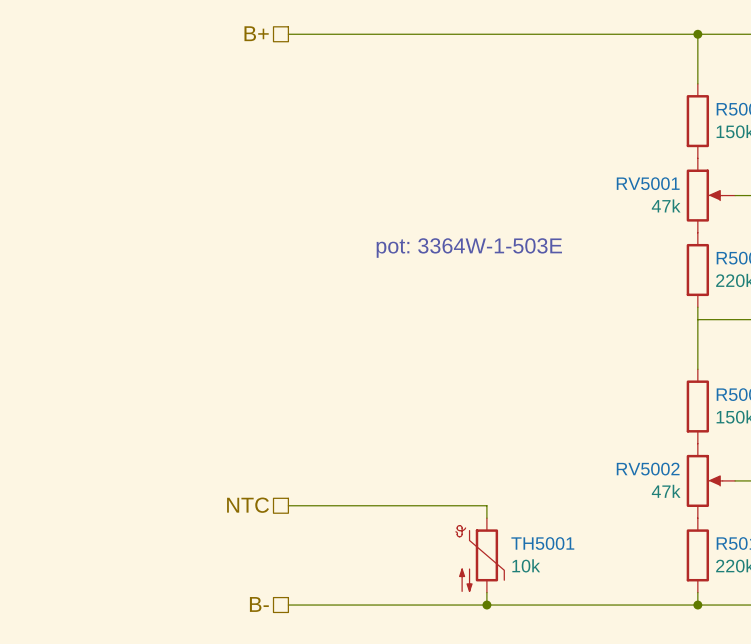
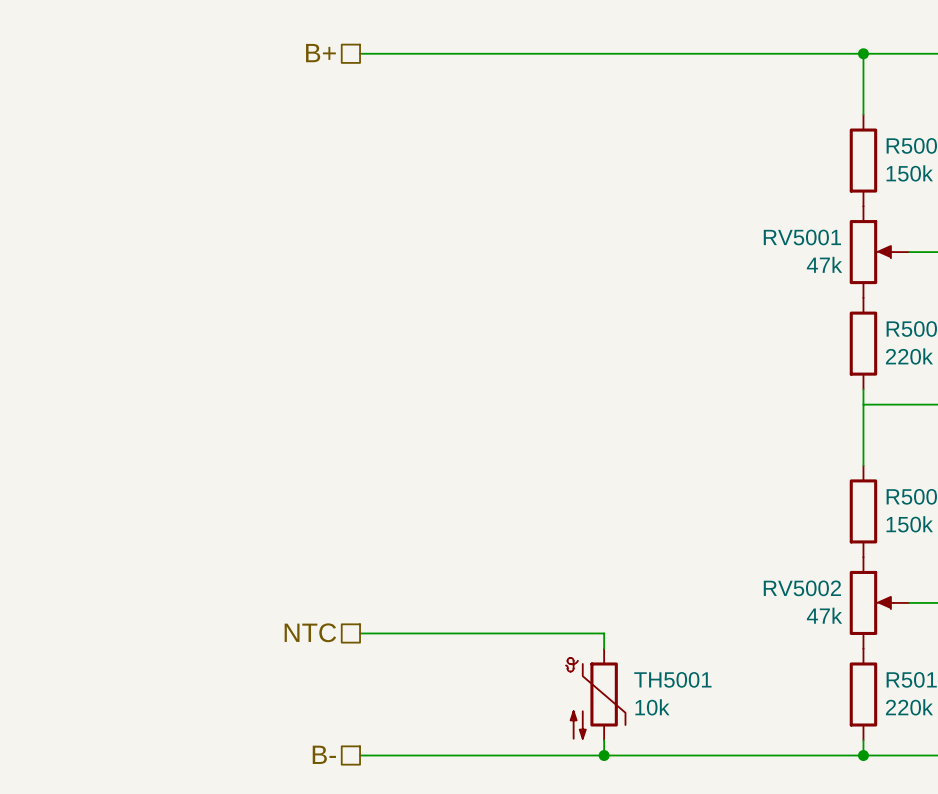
text: pot: 3364W-1-503E (469, 248) -> none

